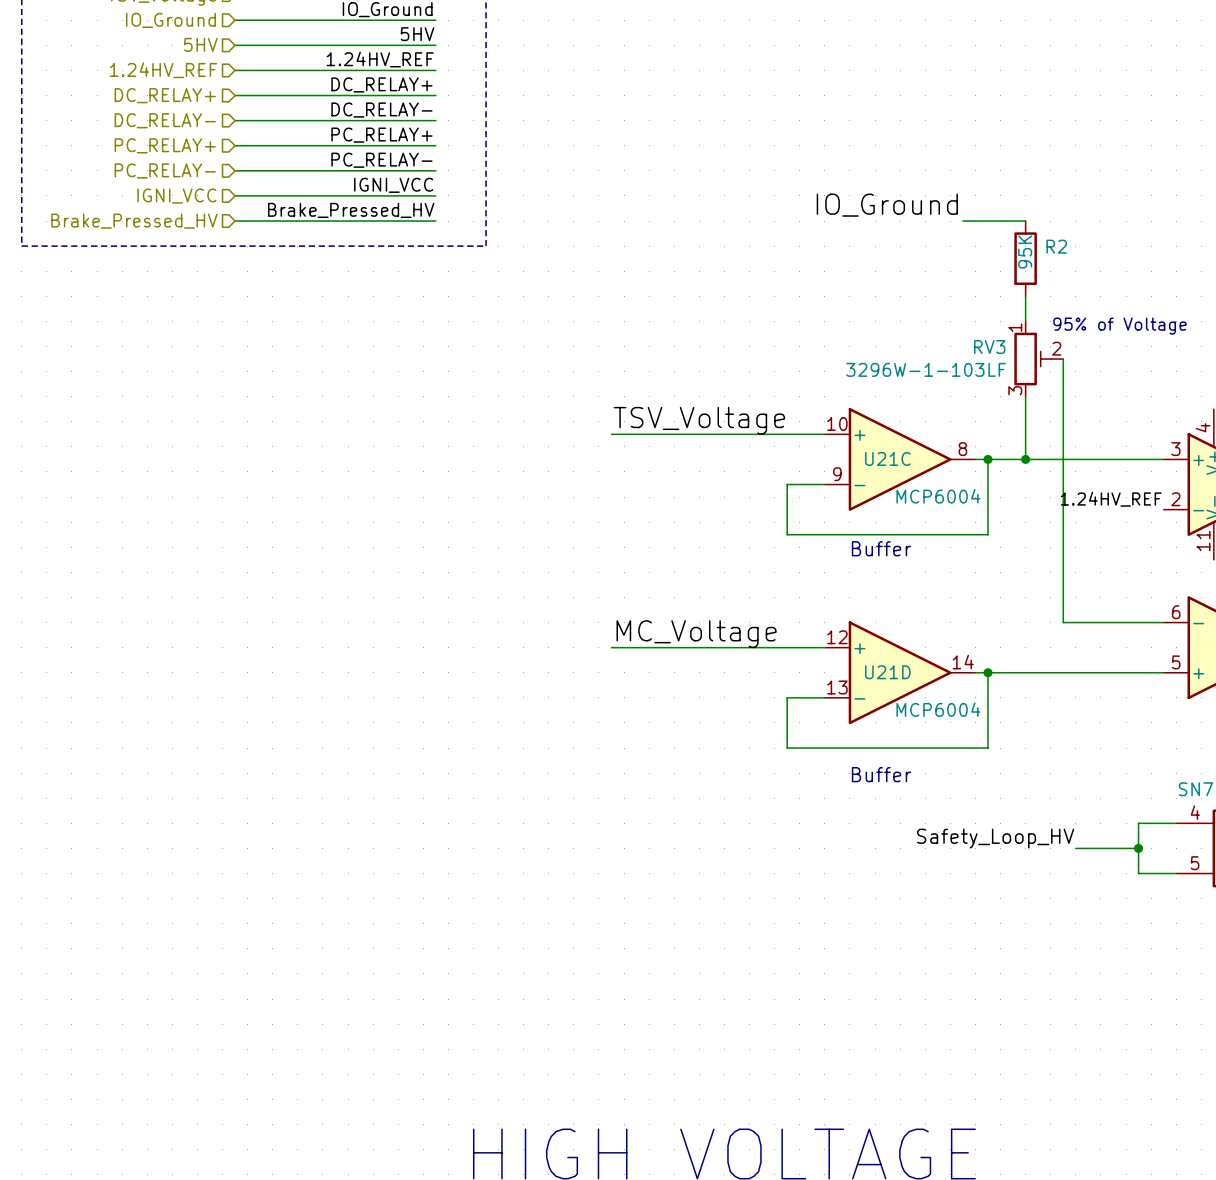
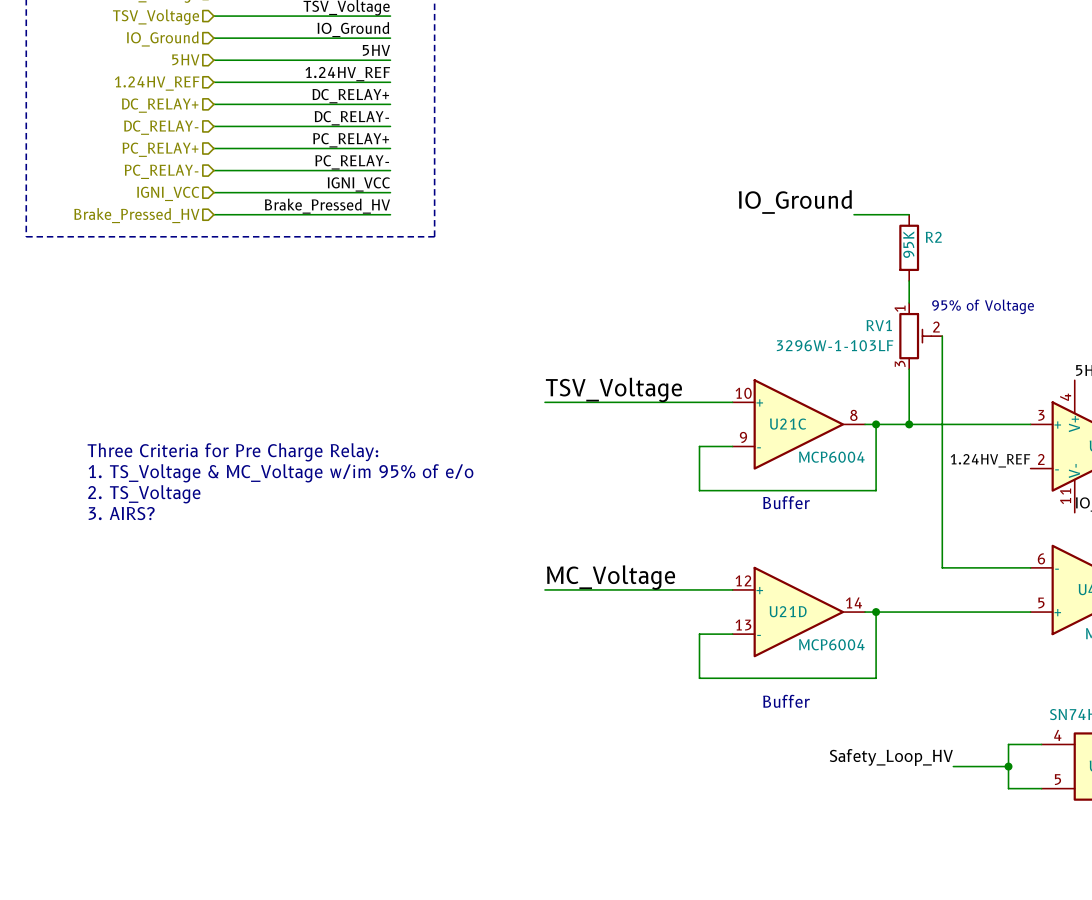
RV3 name: RV3 (989, 347) -> RV1 (879, 325)
text: none -> Three Criteria for Pre Charge Relay: (232, 452)
text: none -> 1. TS_Voltage & MC_Voltage w/im 95% of e/o (281, 473)
text: none -> 2. TS_Voltage (144, 494)
text: none -> 3. AIRS? (121, 513)

